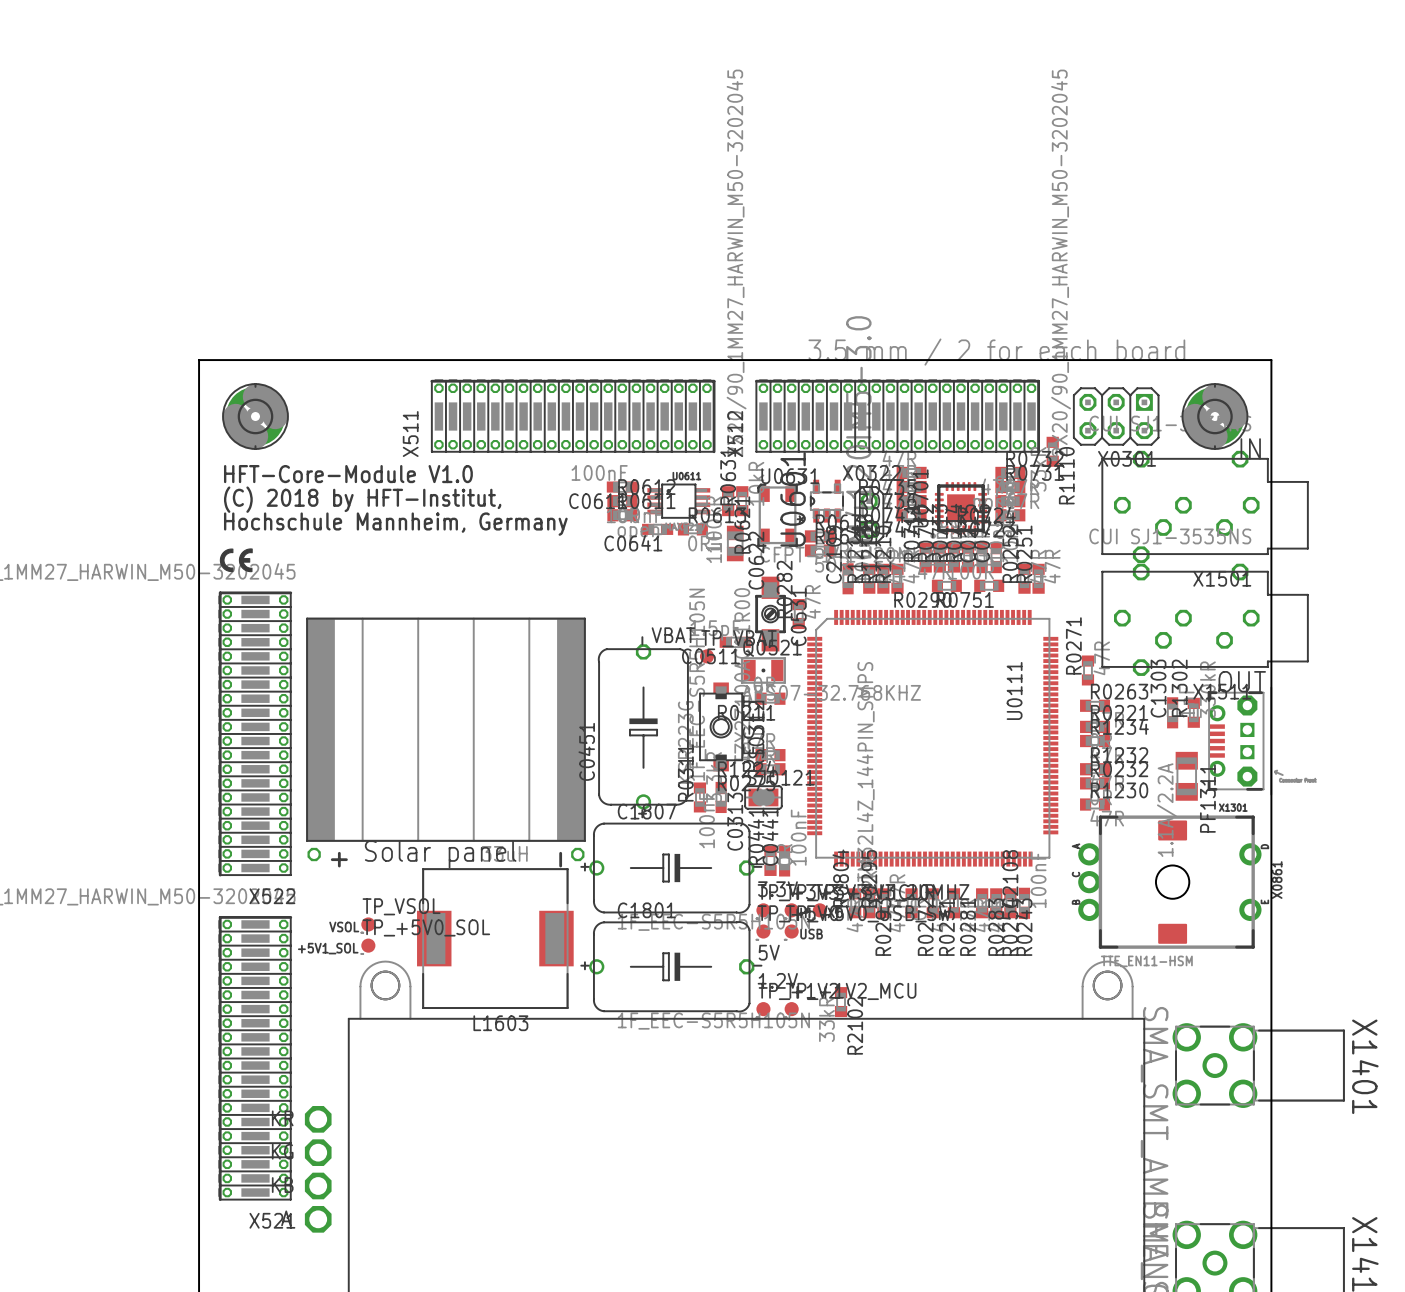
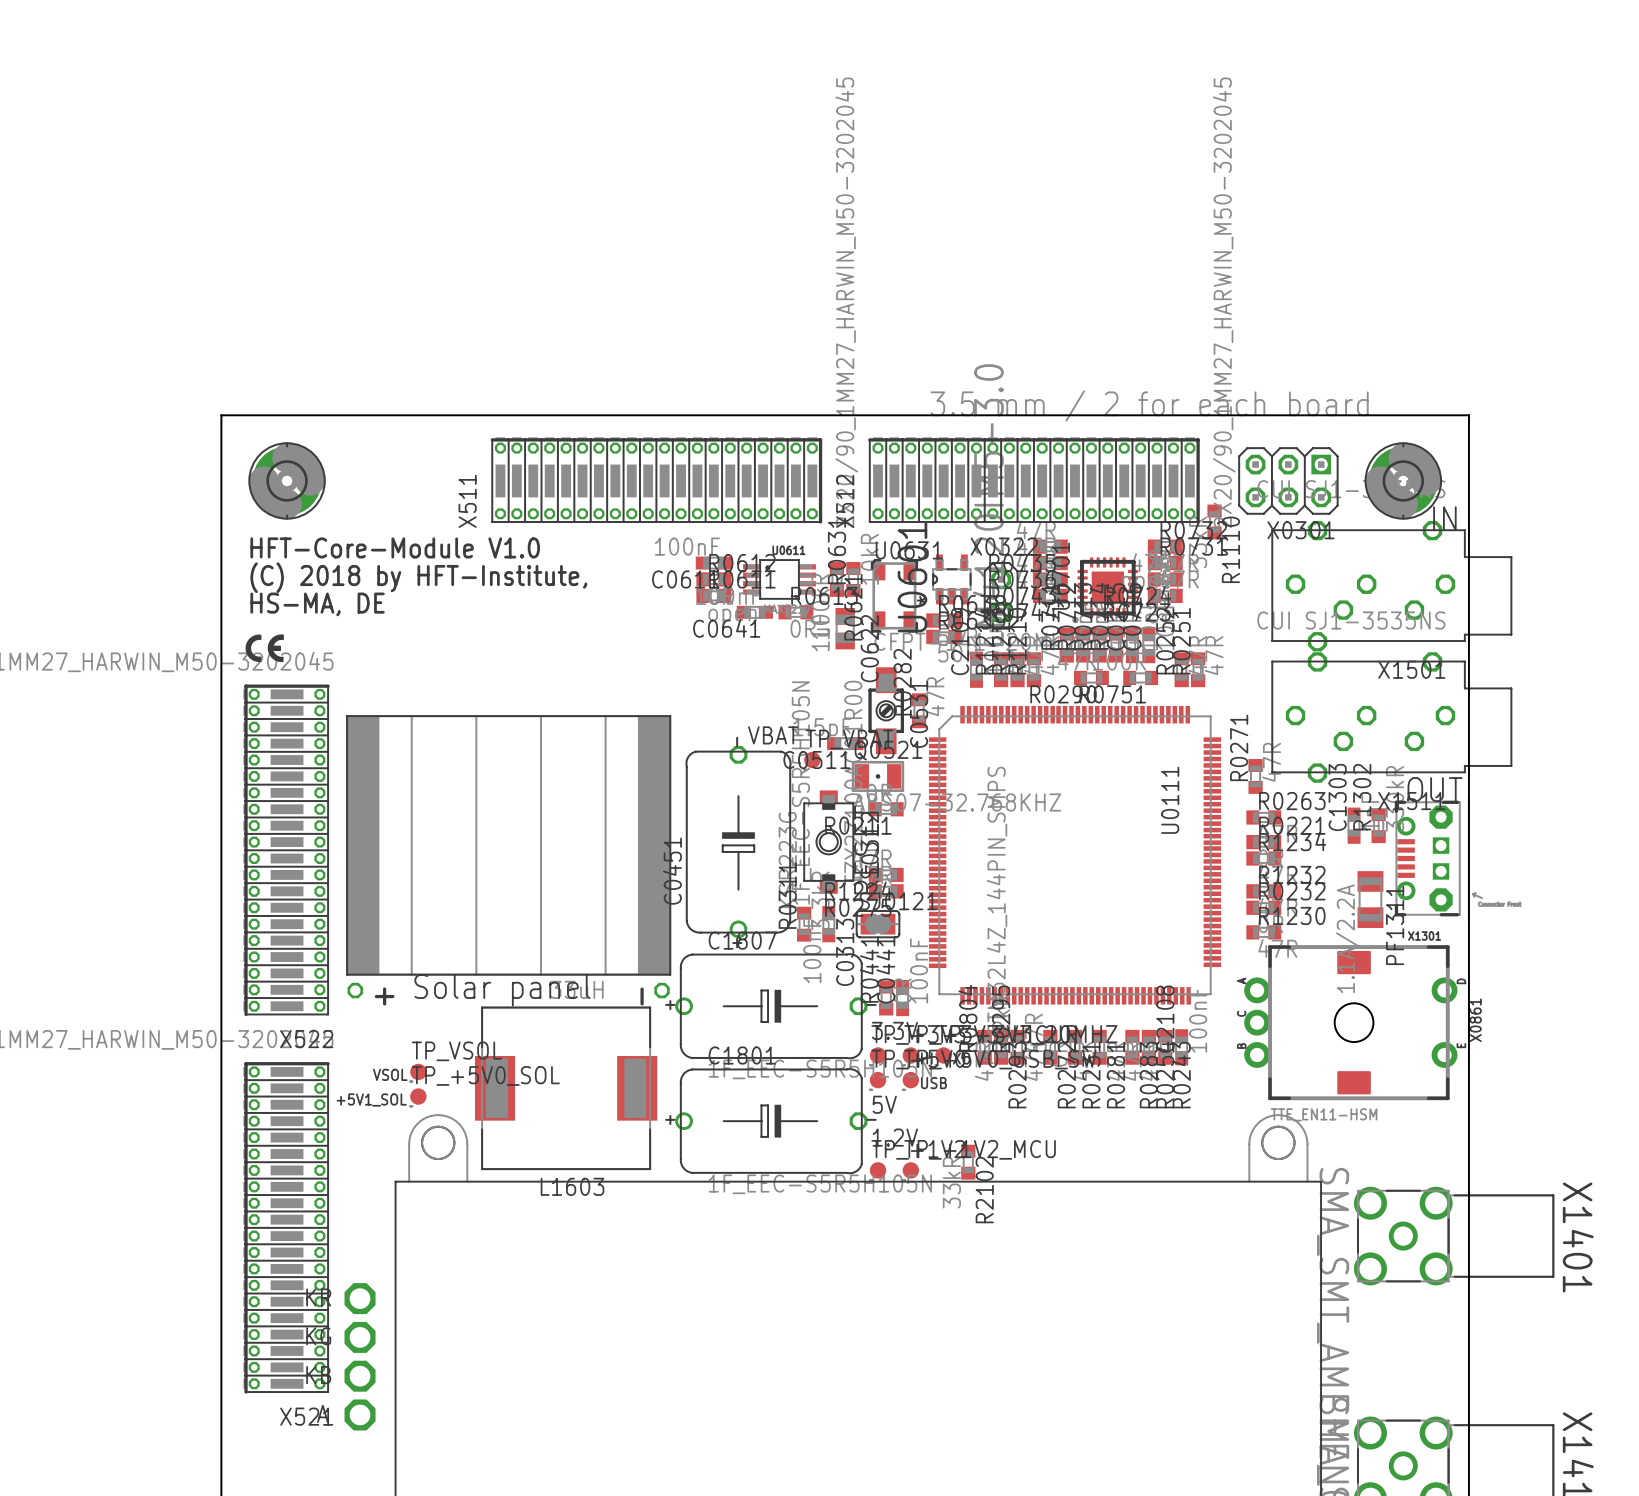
text: (C) 2018 by HFT-Institut, (362, 499) -> (C) 2018 by HFT-Institute, (418, 577)
text: Hochschule Mannheim, Germany (395, 524) -> HS-MA, DE (317, 604)

